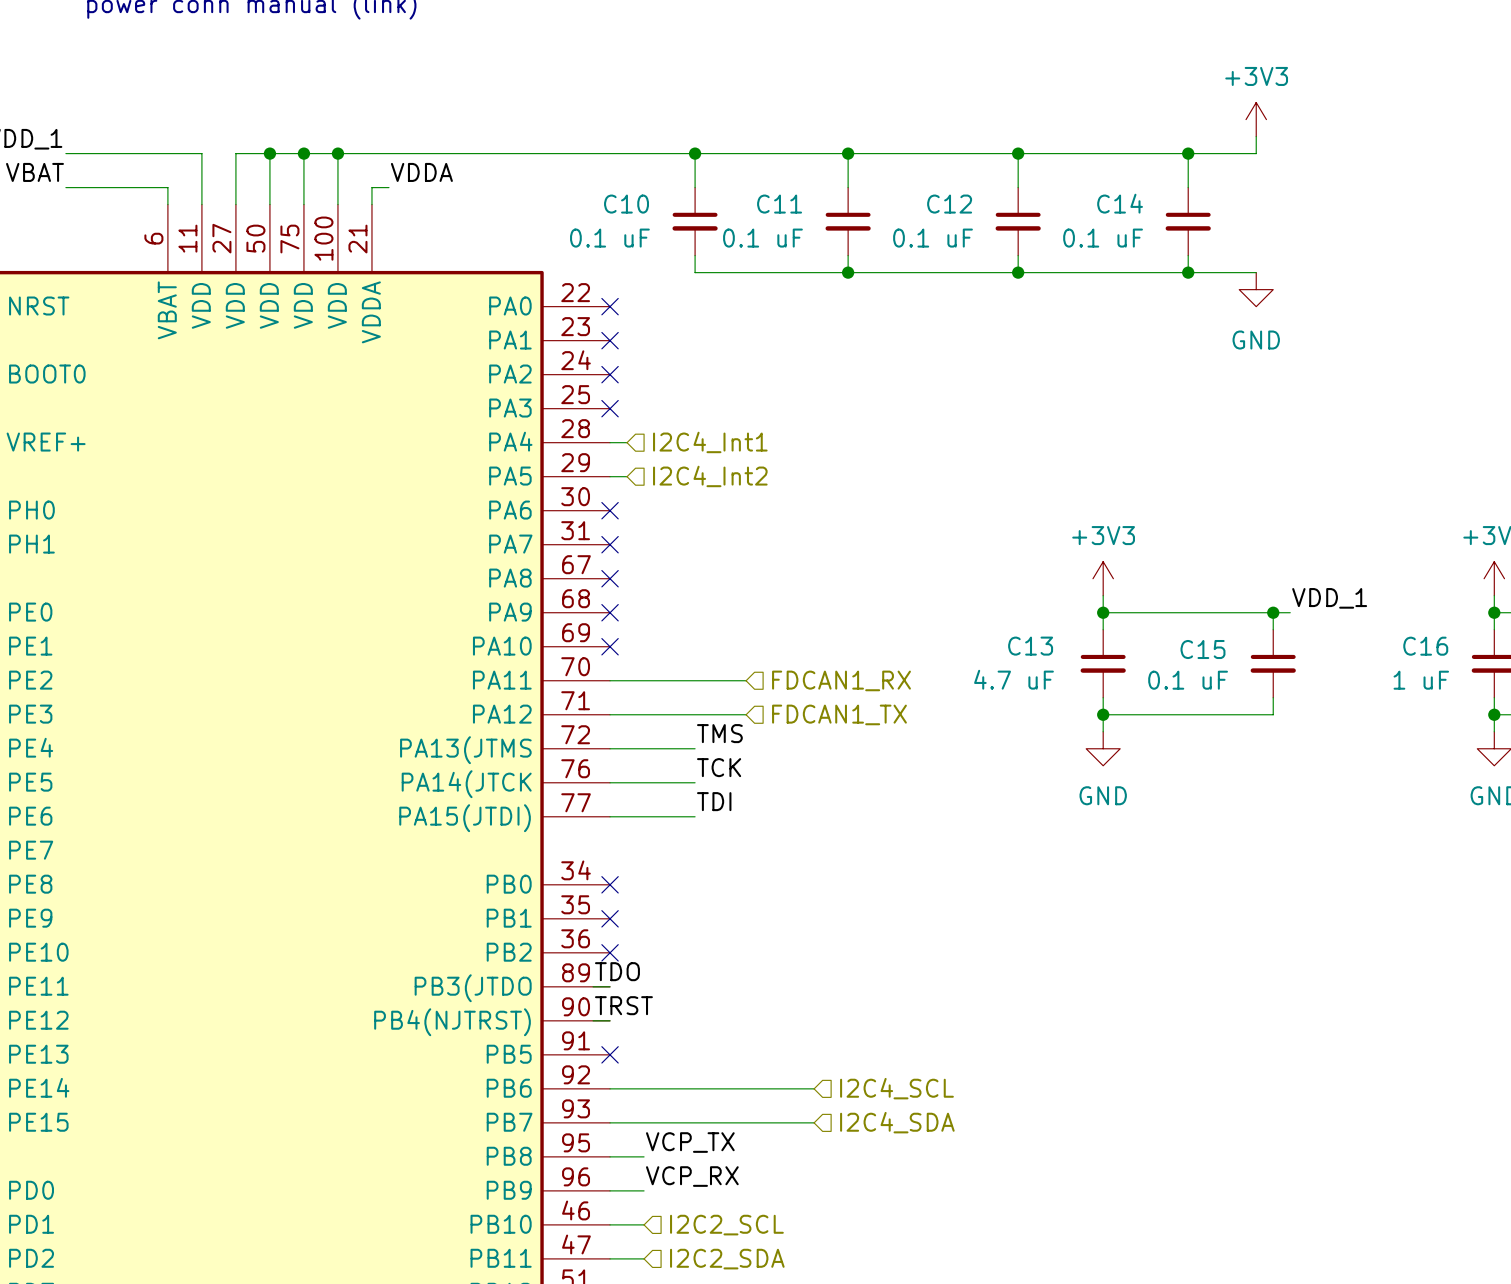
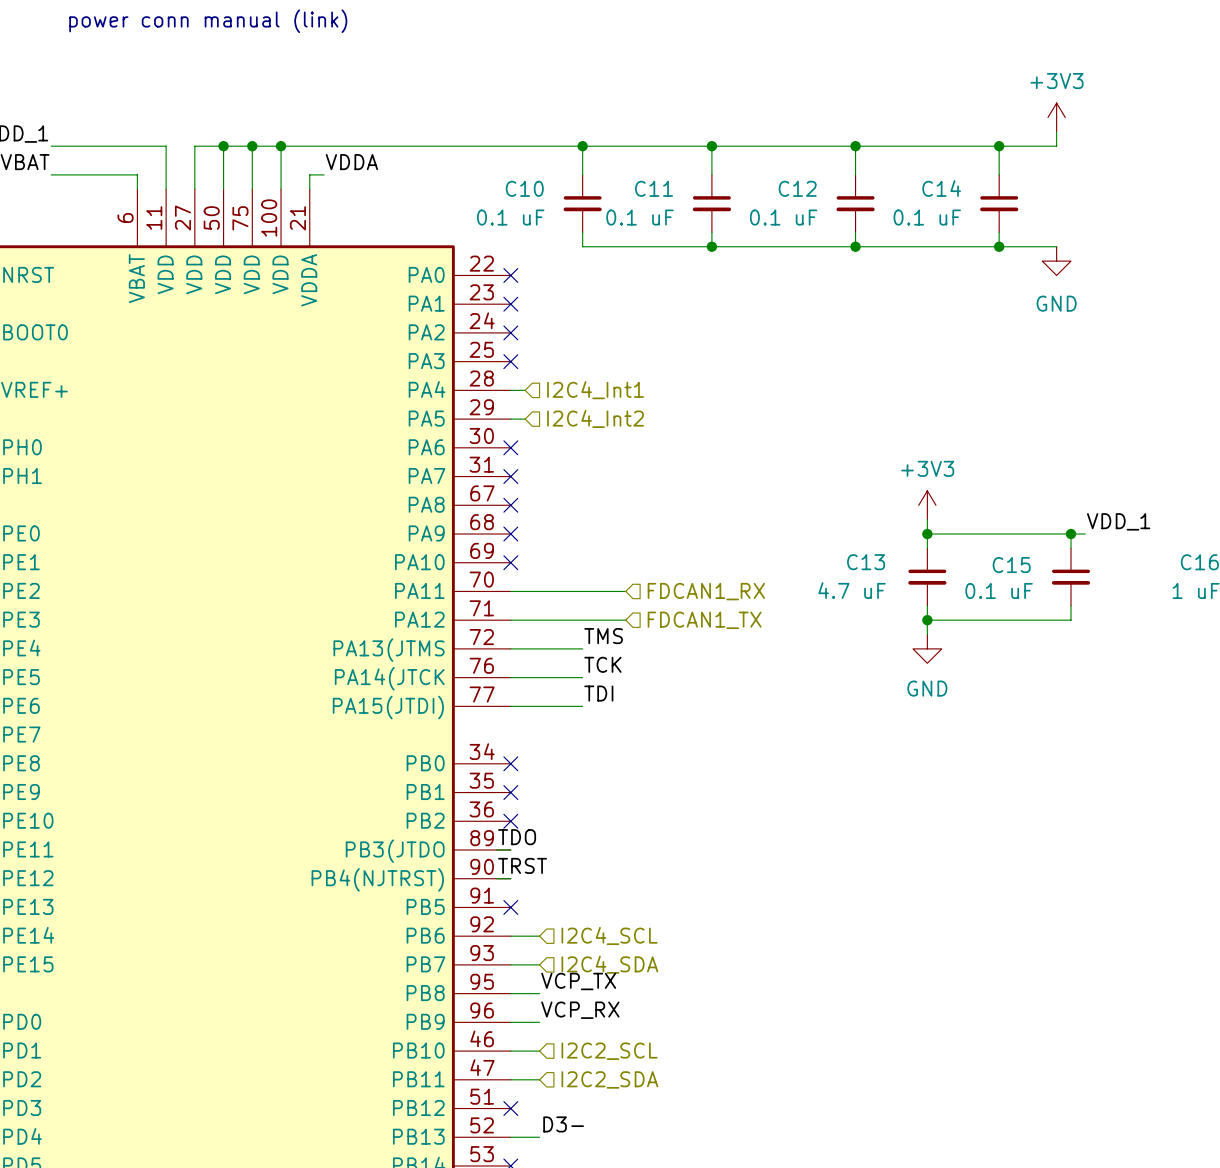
wire: (644, 1088) (814, 1088) -> none
hierarchical label position: I2C4_SCL (896, 1088) -> I2C4_SCL (609, 935)
wire: (644, 1122) (814, 1122) -> none
hierarchical label position: I2C4_SDA (897, 1122) -> I2C4_SDA (609, 964)

